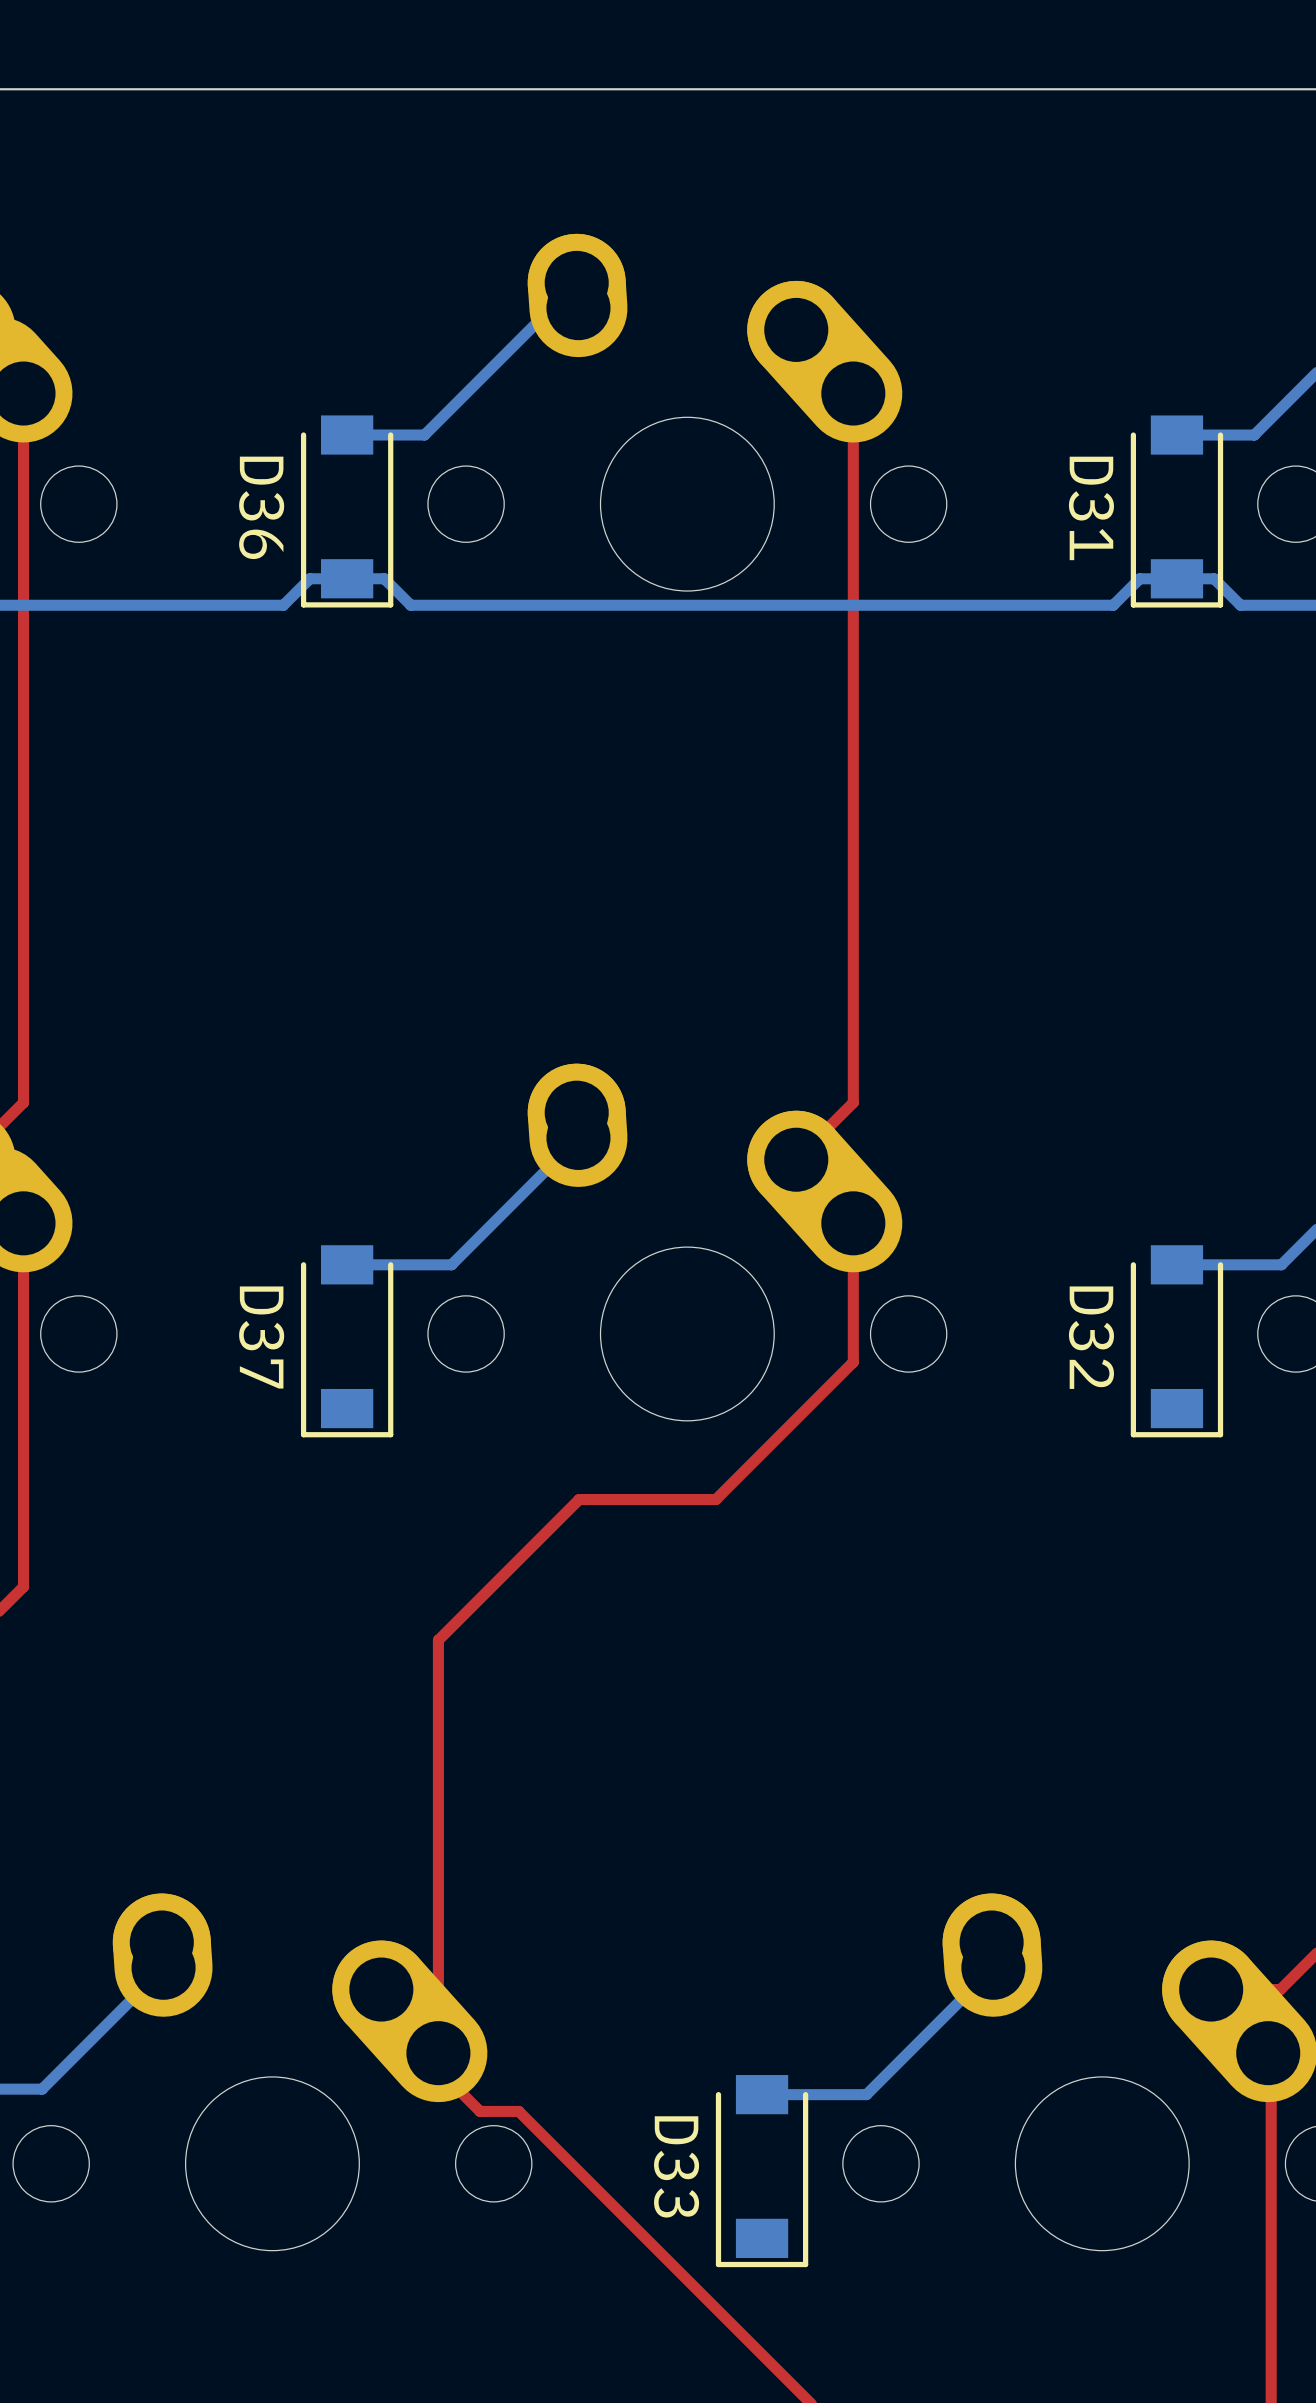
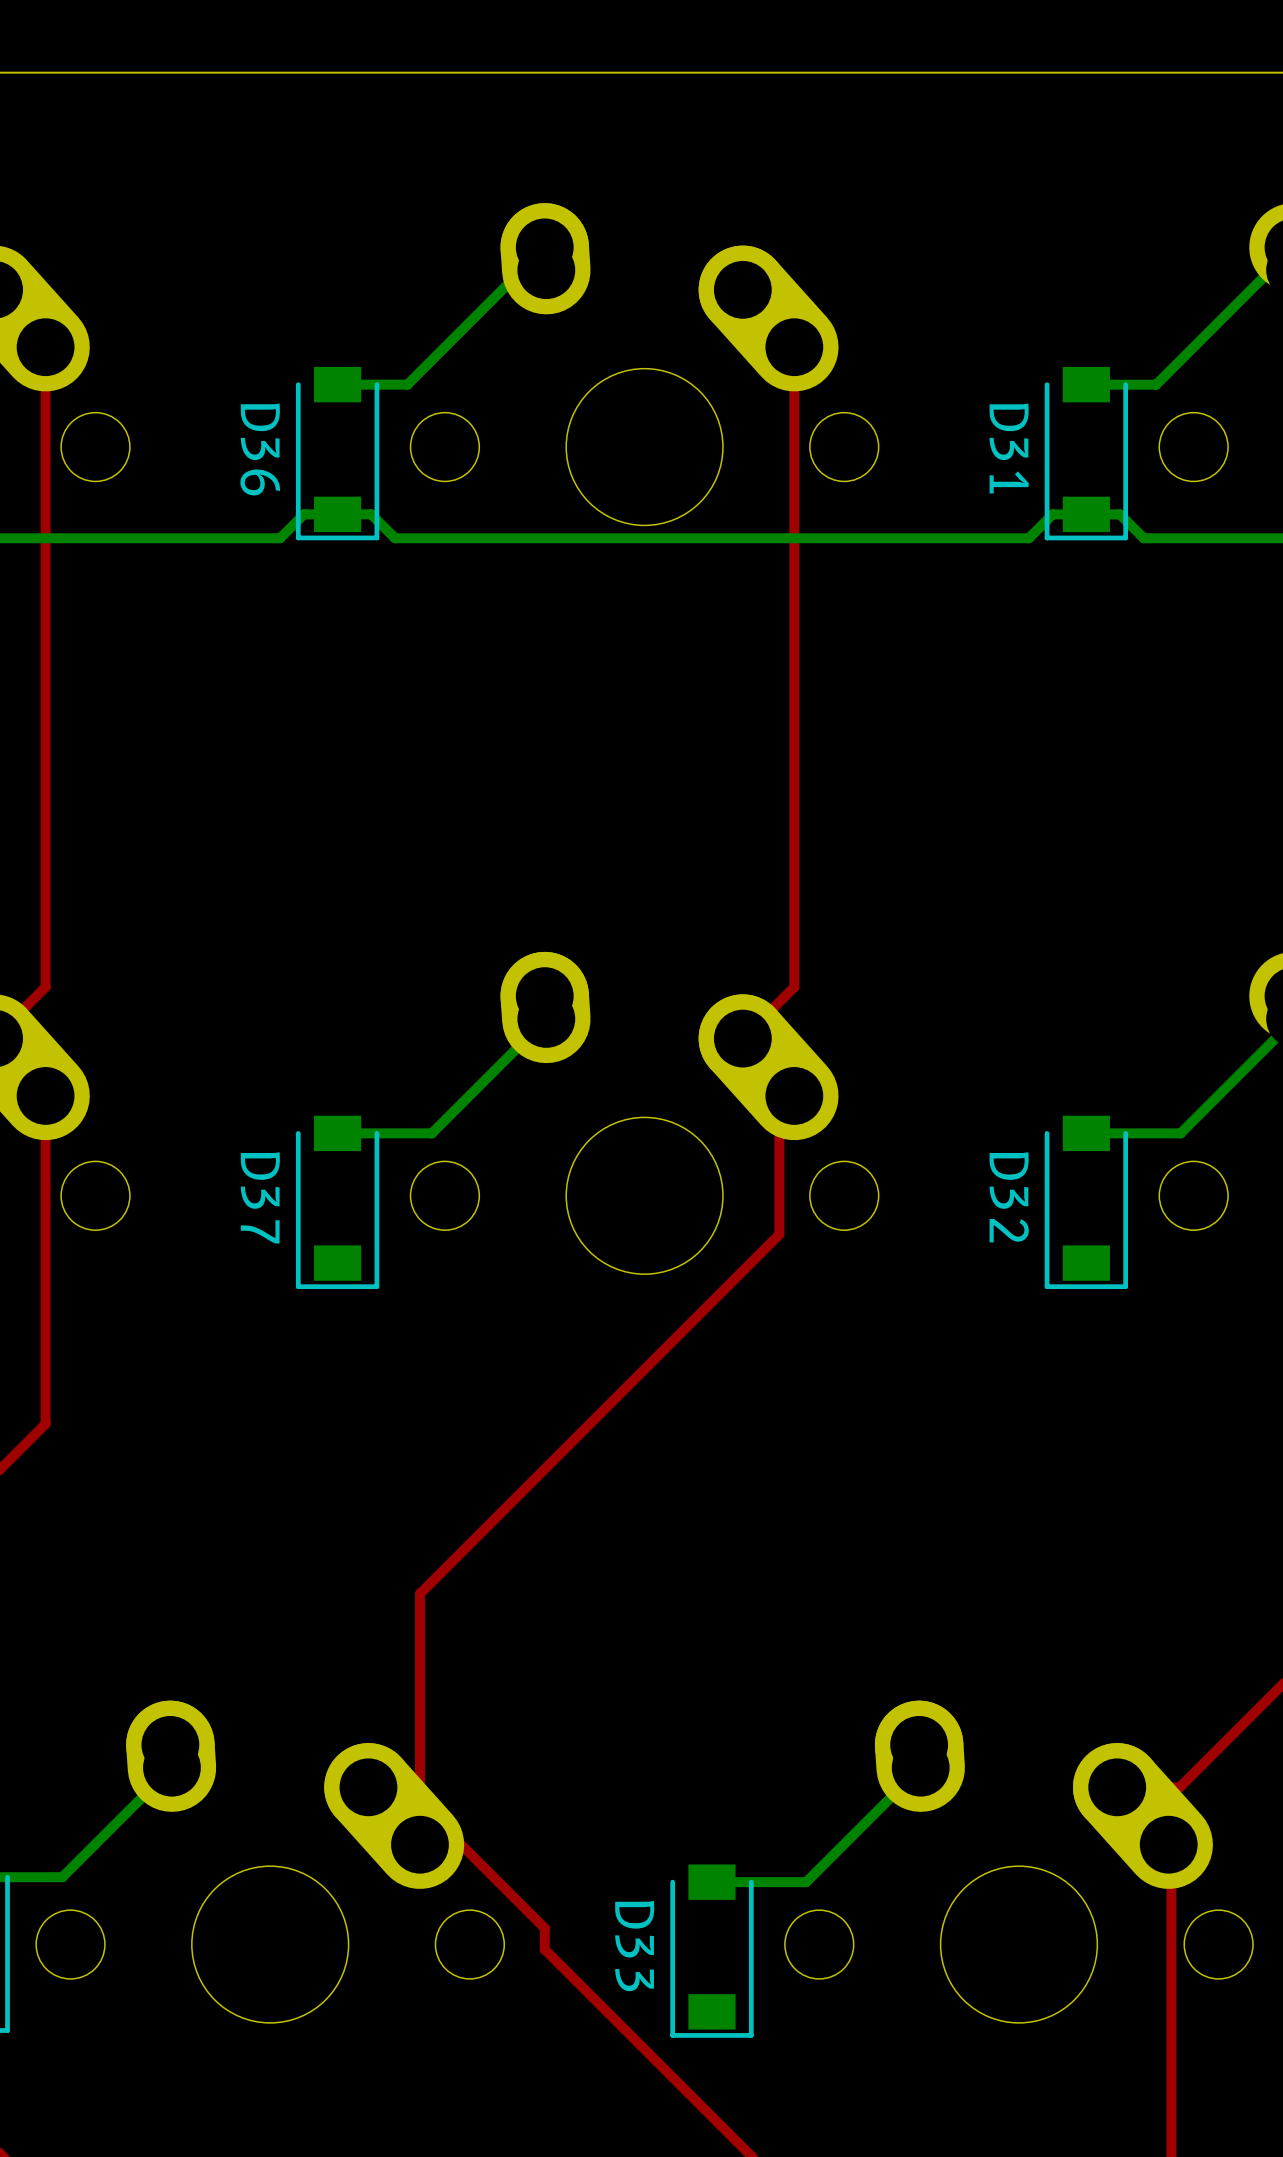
top track: (853, 1223) (853, 1362) (715, 1499) (579, 1499) (438, 1640) (438, 1775) -> (794, 1095) (779, 1110) (779, 1234) (419, 1593)
top track: (438, 2053) (438, 2069) (480, 2111) (518, 2111) (576, 2169) -> (419, 1844) (461, 1844) (544, 1928) (544, 1949)

